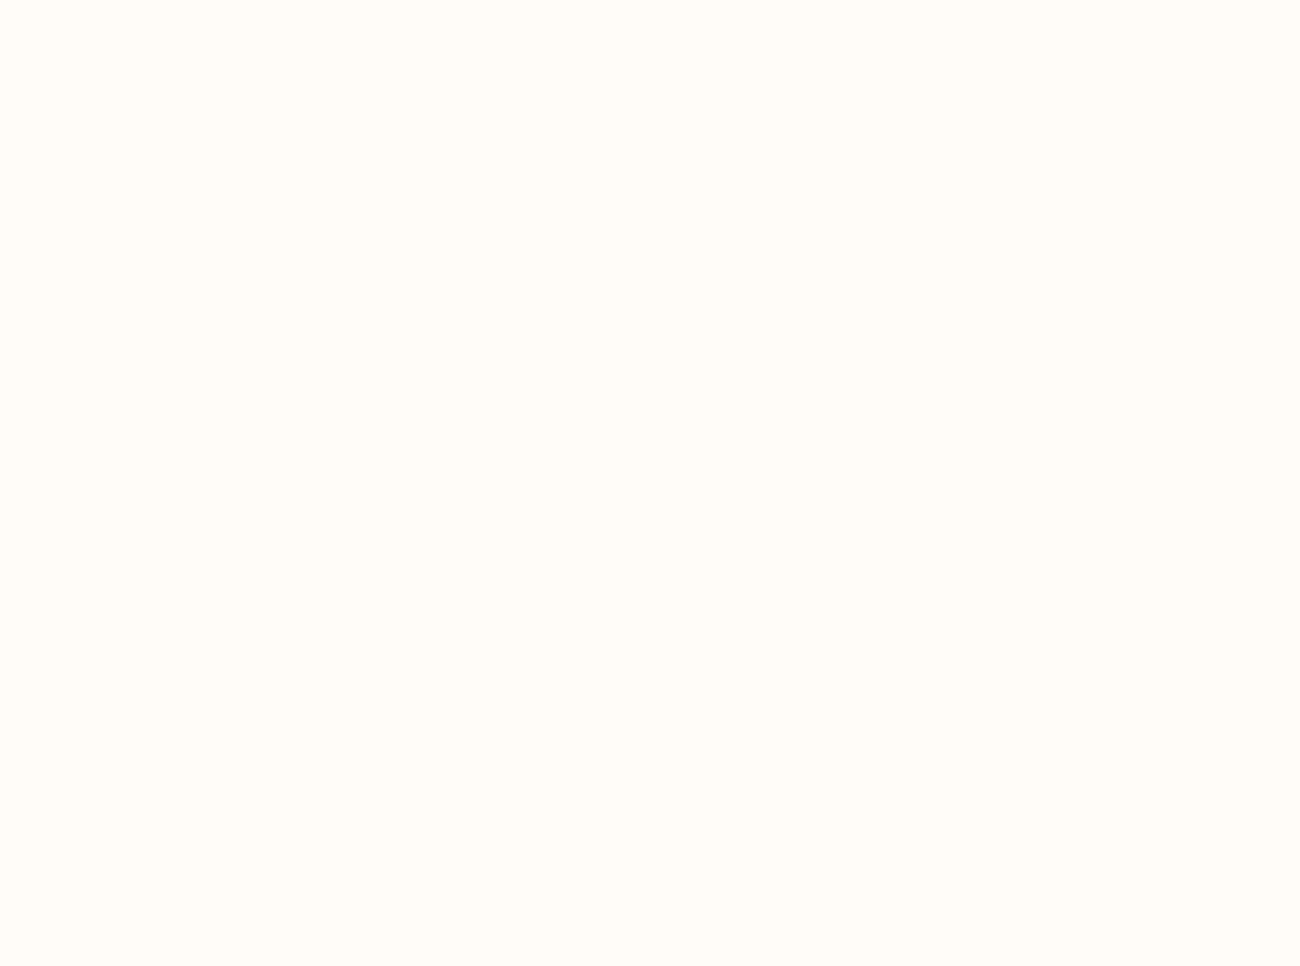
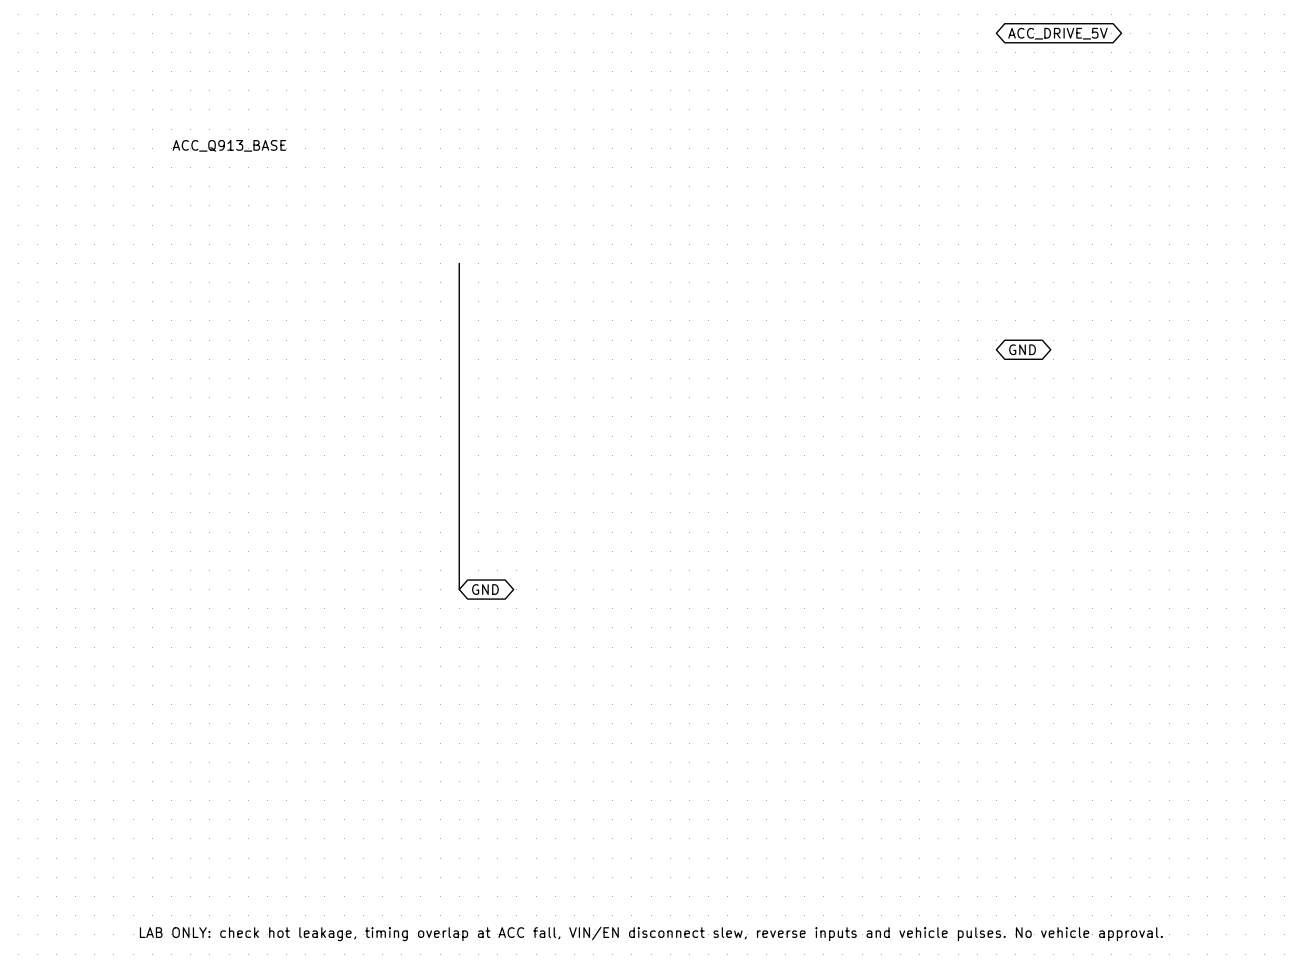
global label: none -> ACC_DRIVE_5V (1057, 33)
label: none -> ACC_Q913_BASE (229, 145)
wire: none -> (459, 263) (459, 589)
global label: none -> GND (1022, 349)
global label: none -> GND (485, 589)
text: none -> LAB ONLY: check hot leakage, timing overlap at ACC fall, VIN/EN disconnect slew, reverse inputs and vehicle pulses. No vehicle approval. (651, 933)

